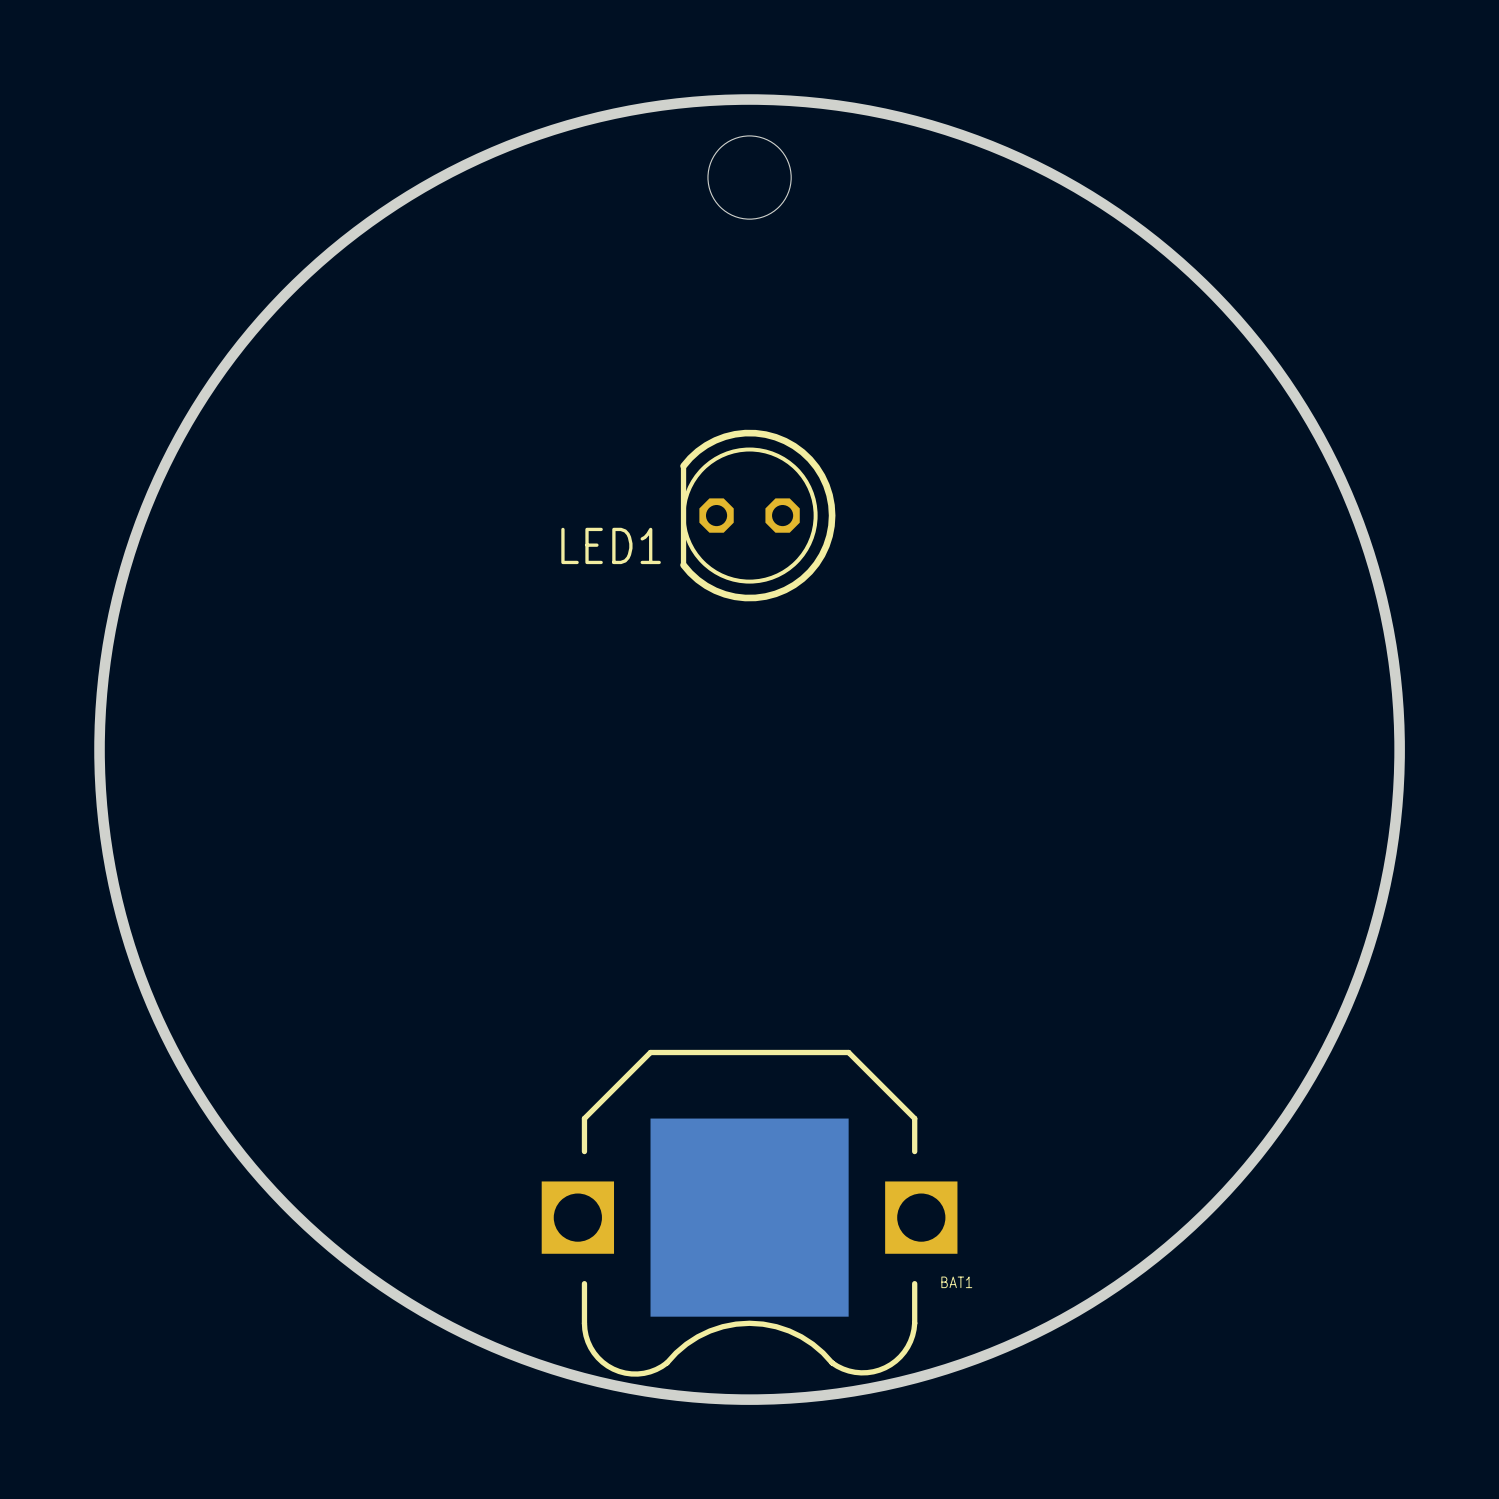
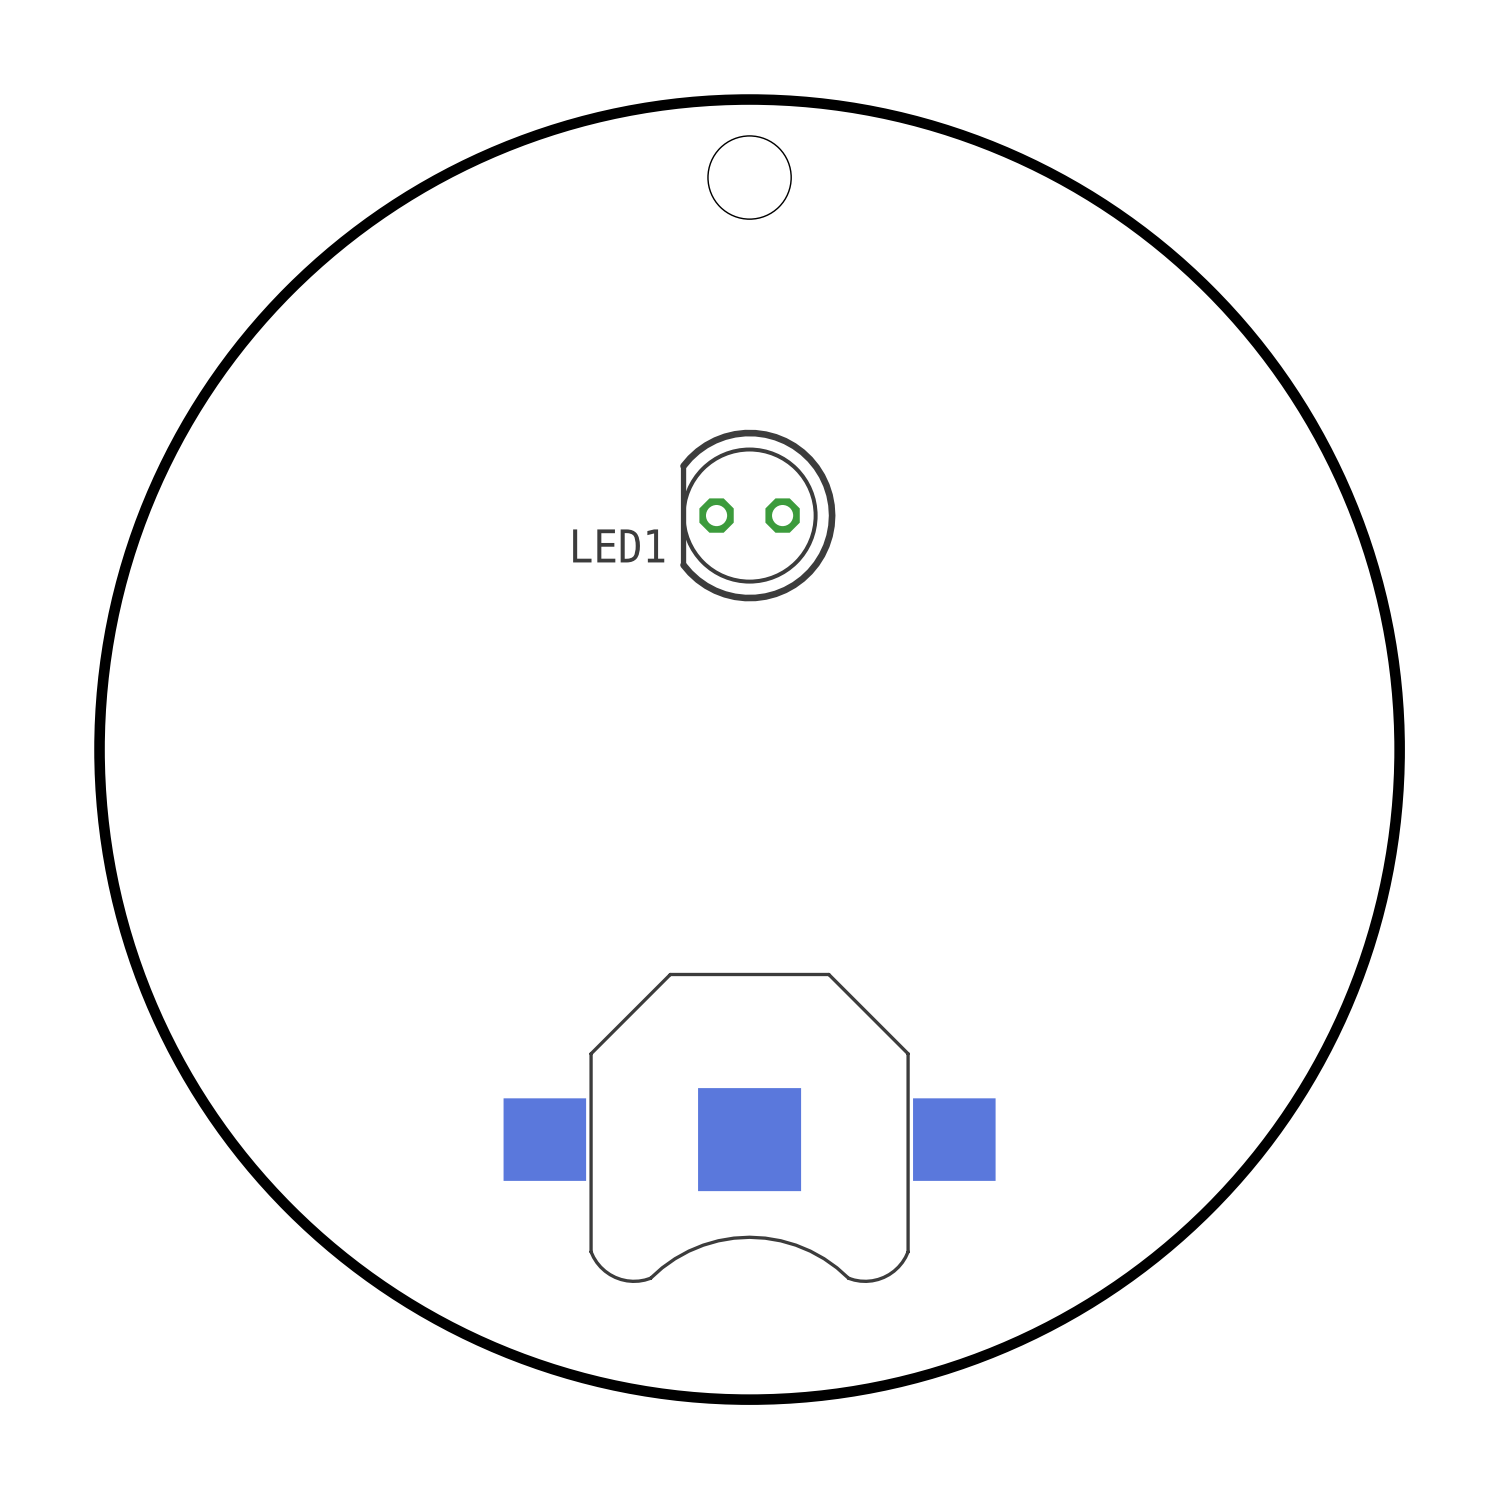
part: none -> (749, 1127)
BAT1: (749, 1213) -> none

